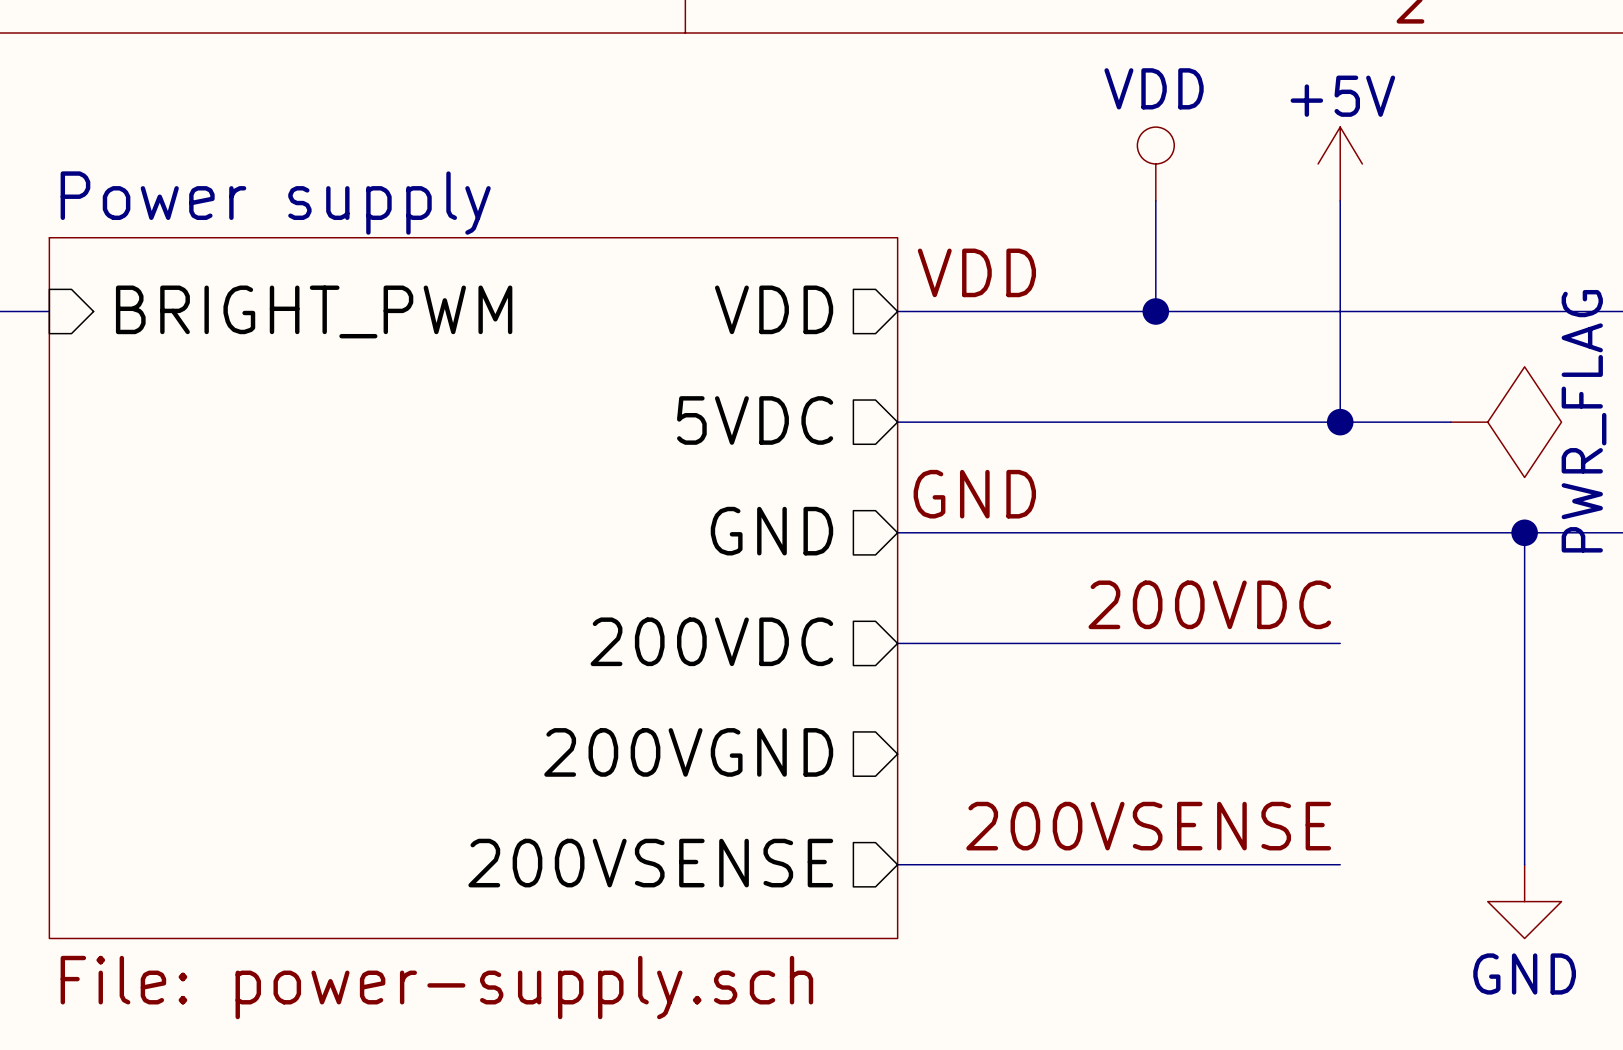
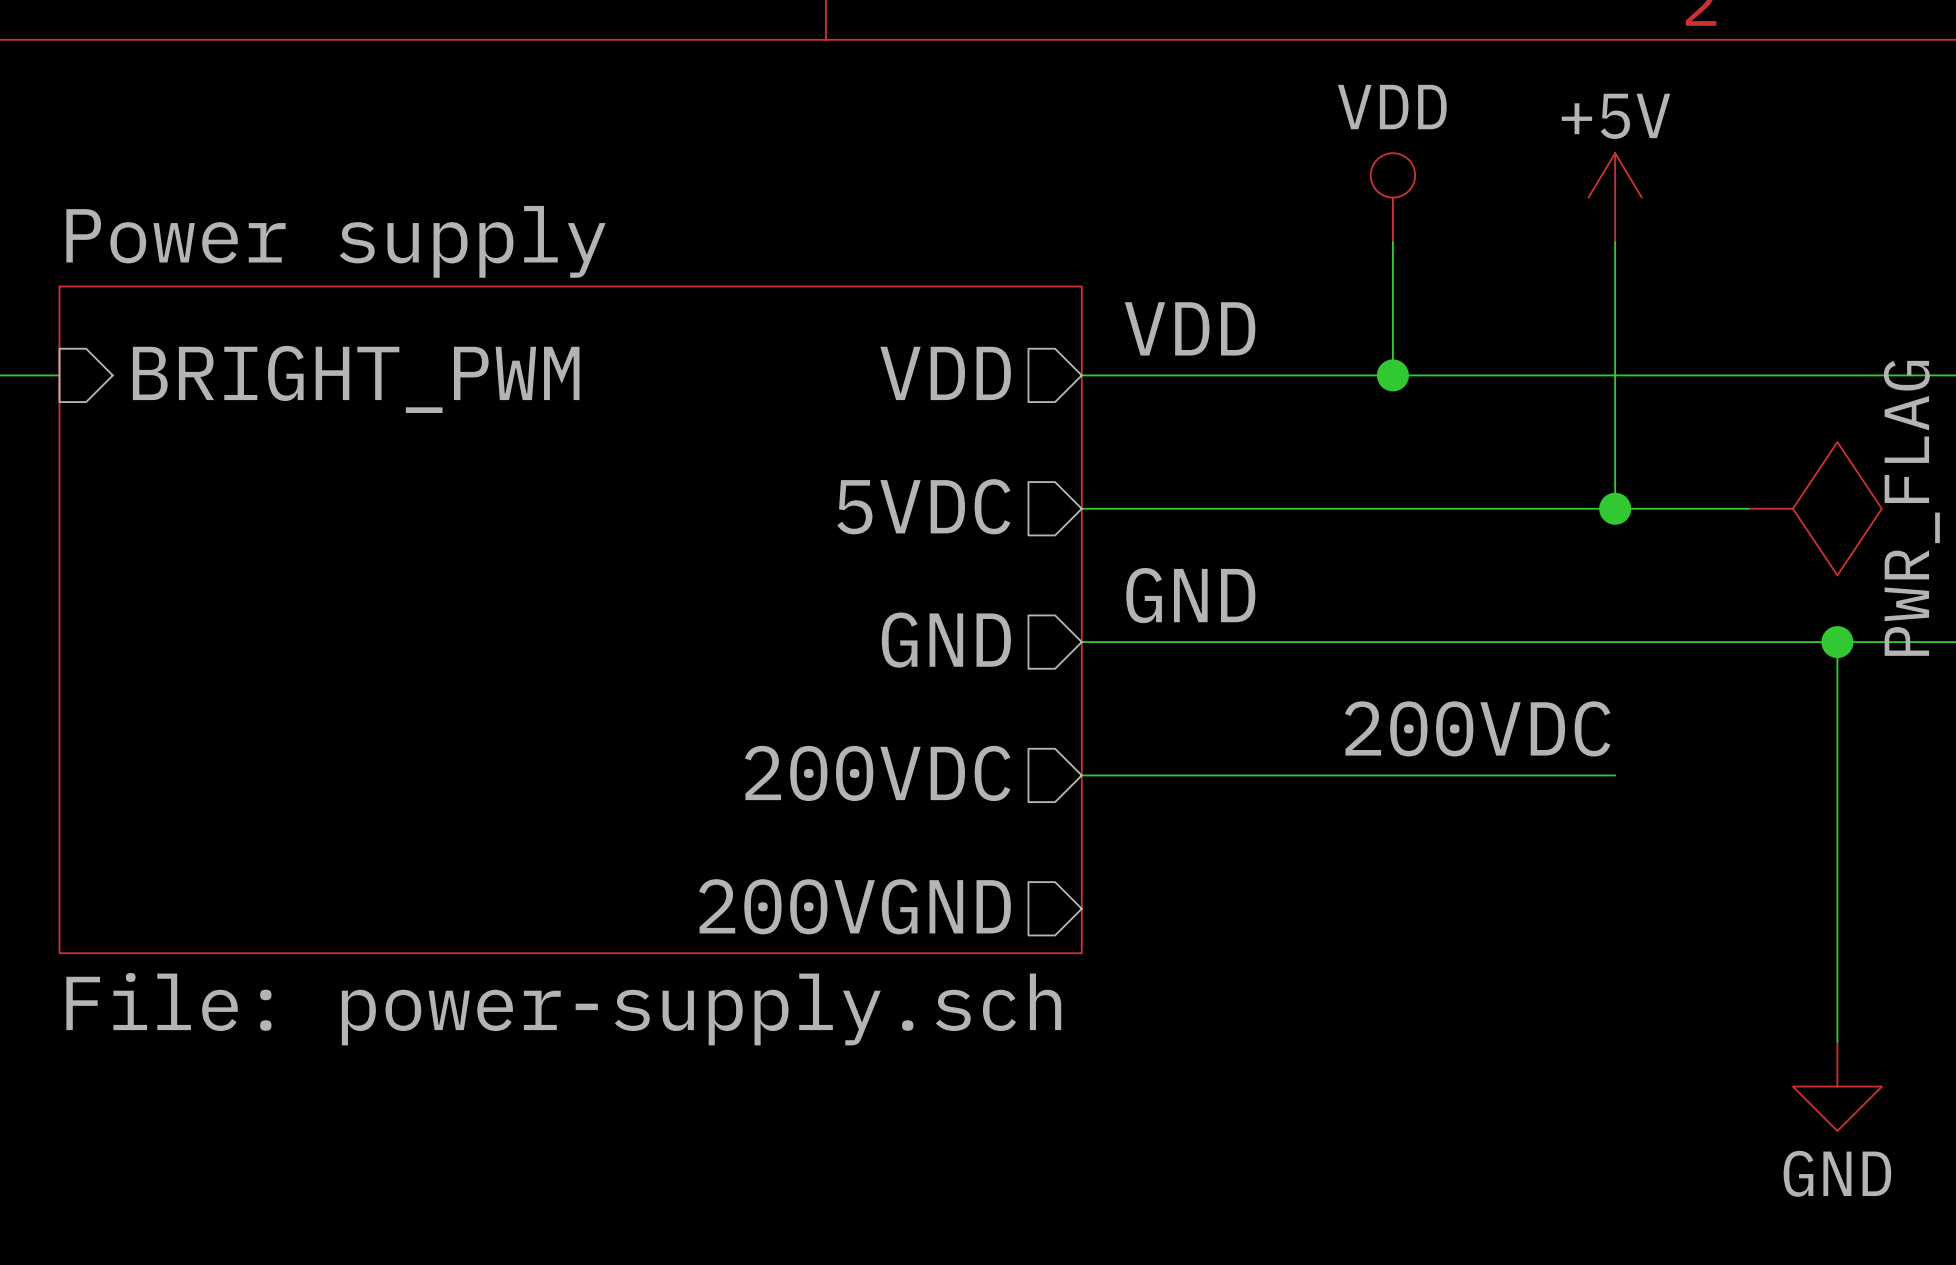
sheet Power supply: none -> File: power-supply.sch (570, 619)
sheet Power supply: File: power-supply.sch (473, 588) -> none
label: 200VSENSE (1148, 826) -> none
sheet pin: 200VSENSE (650, 863) -> none
wire: (897, 864) (1340, 864) -> none

